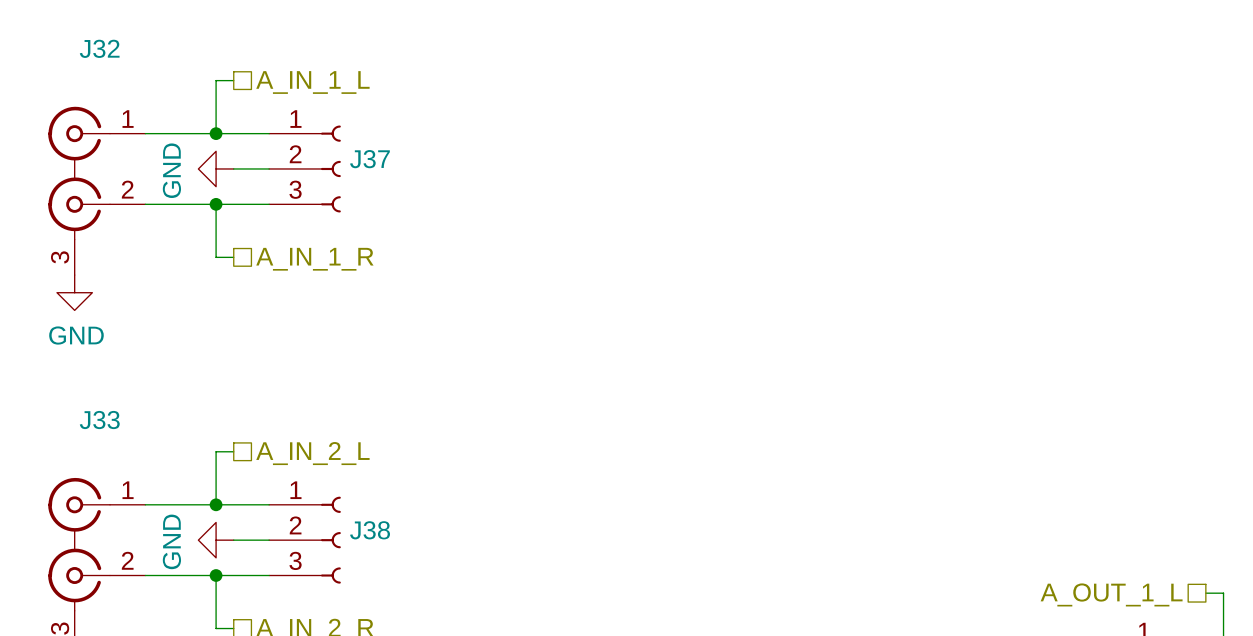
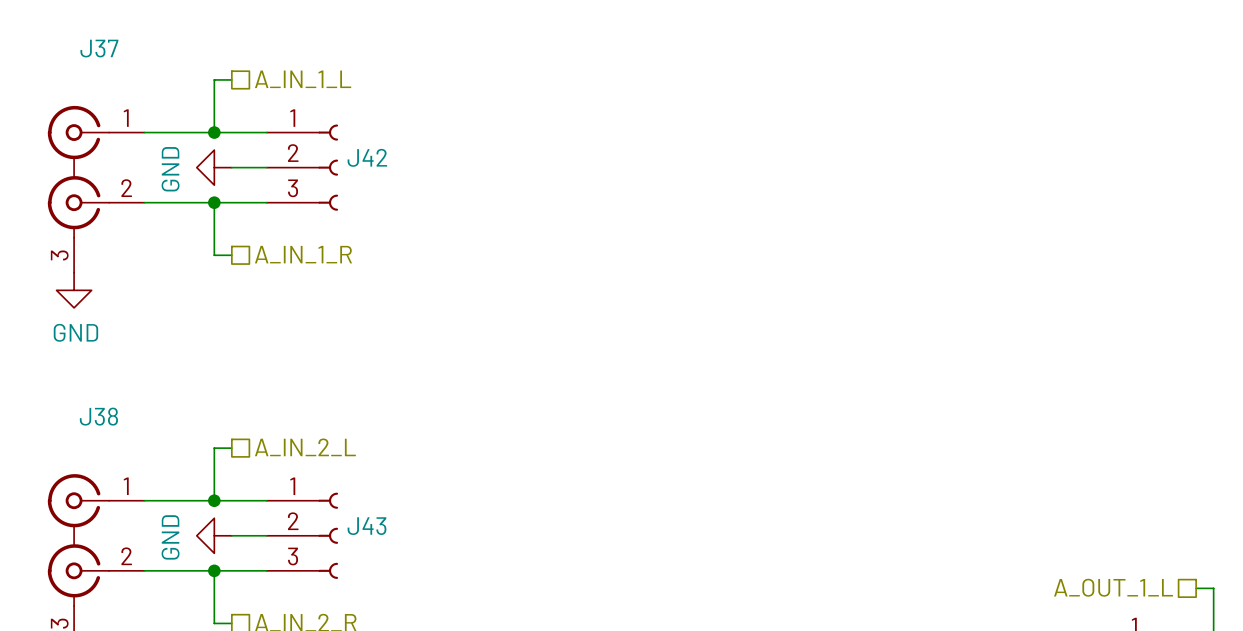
J32 name: J32 (99, 48) -> J37 (99, 48)
J37 name: J37 (369, 159) -> J42 (367, 157)
J33 name: J33 (99, 420) -> J38 (98, 416)
J38 name: J38 (370, 530) -> J43 (366, 526)

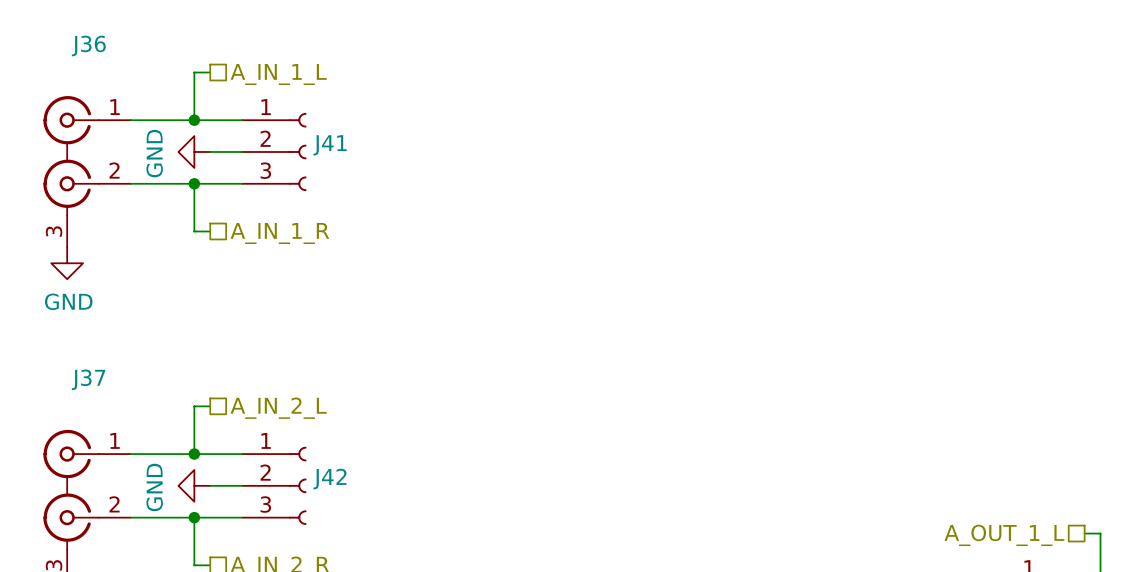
J37 name: J37 (99, 48) -> J36 (88, 45)
J42 name: J42 (367, 157) -> J41 (330, 145)
J38 name: J38 (98, 416) -> J37 (88, 379)
J43 name: J43 (366, 526) -> J42 (329, 479)

